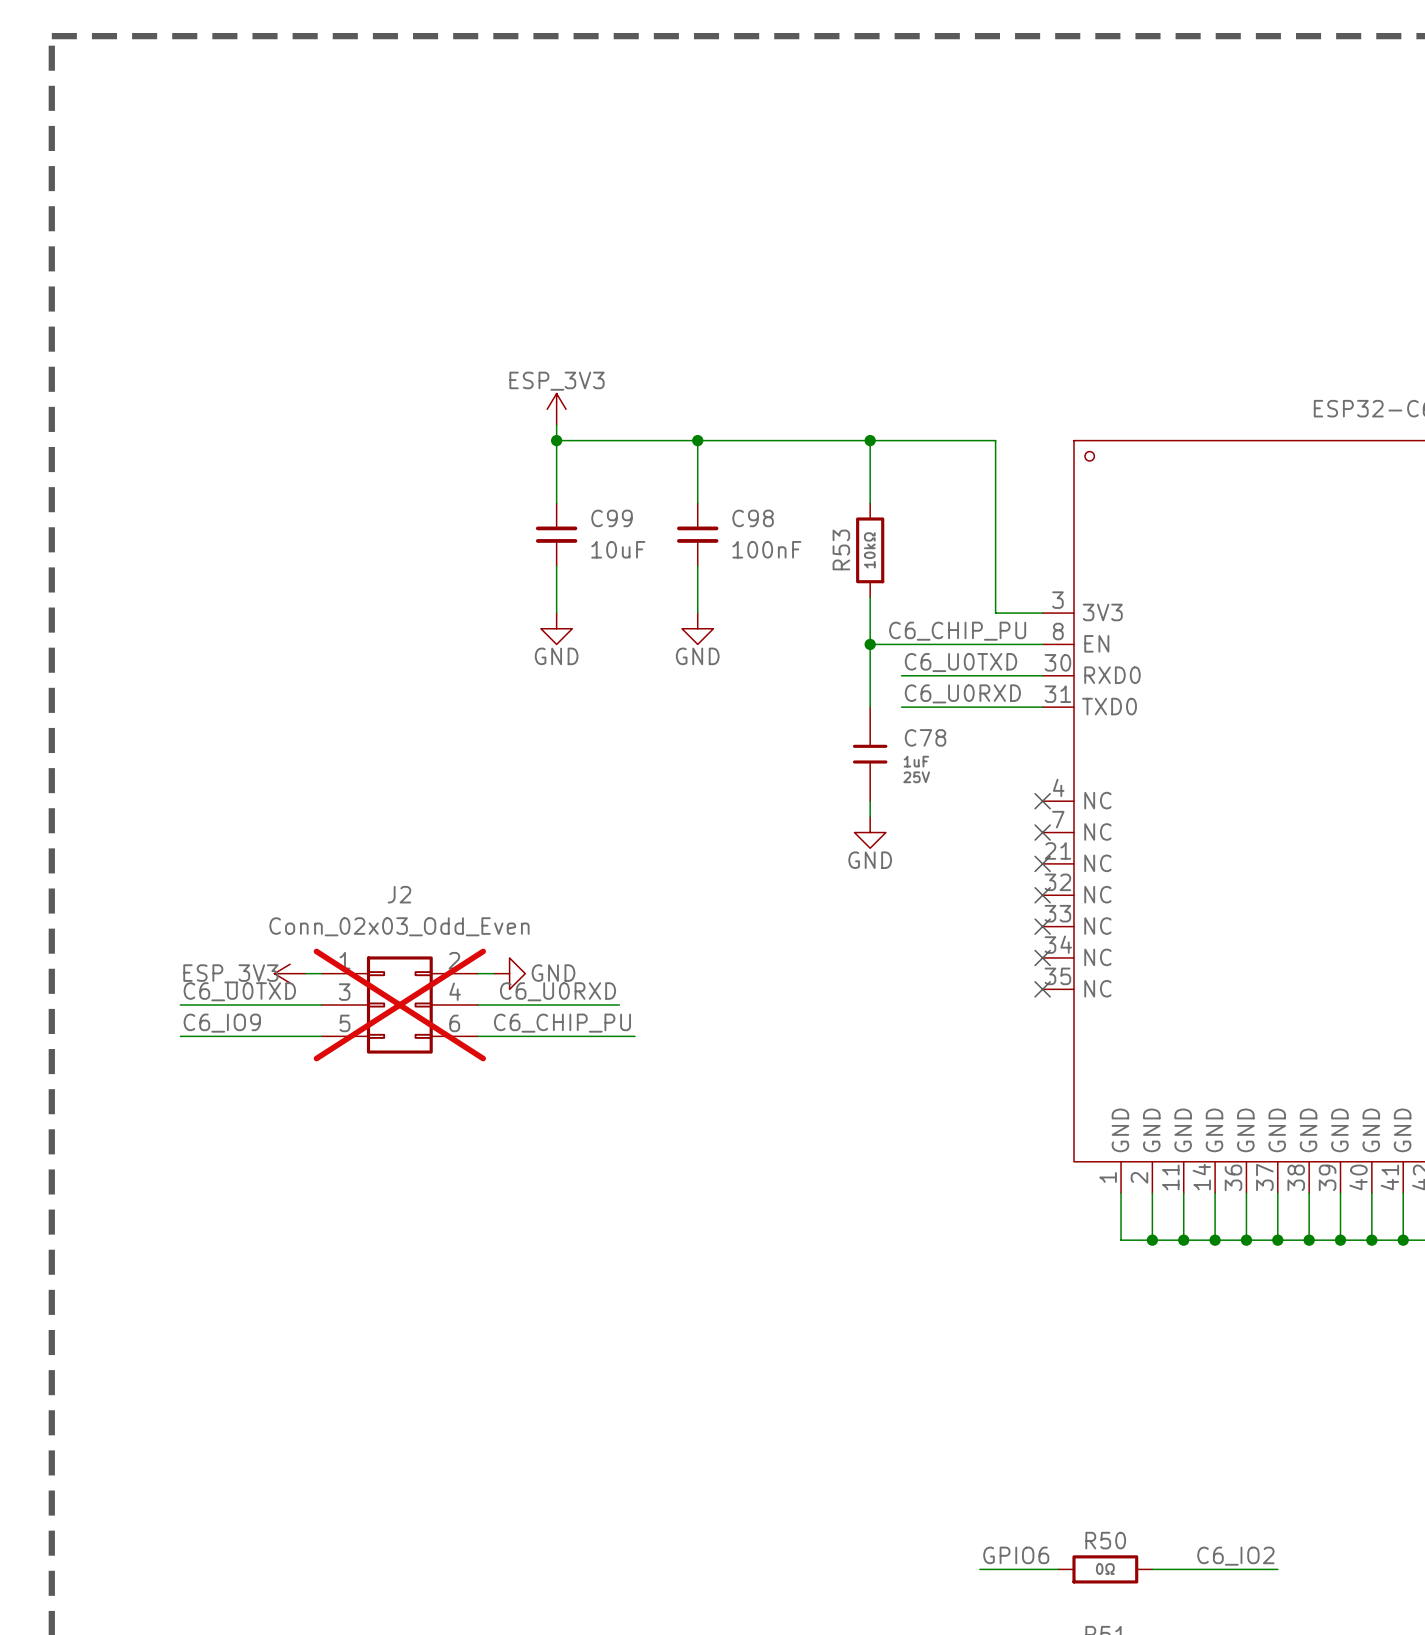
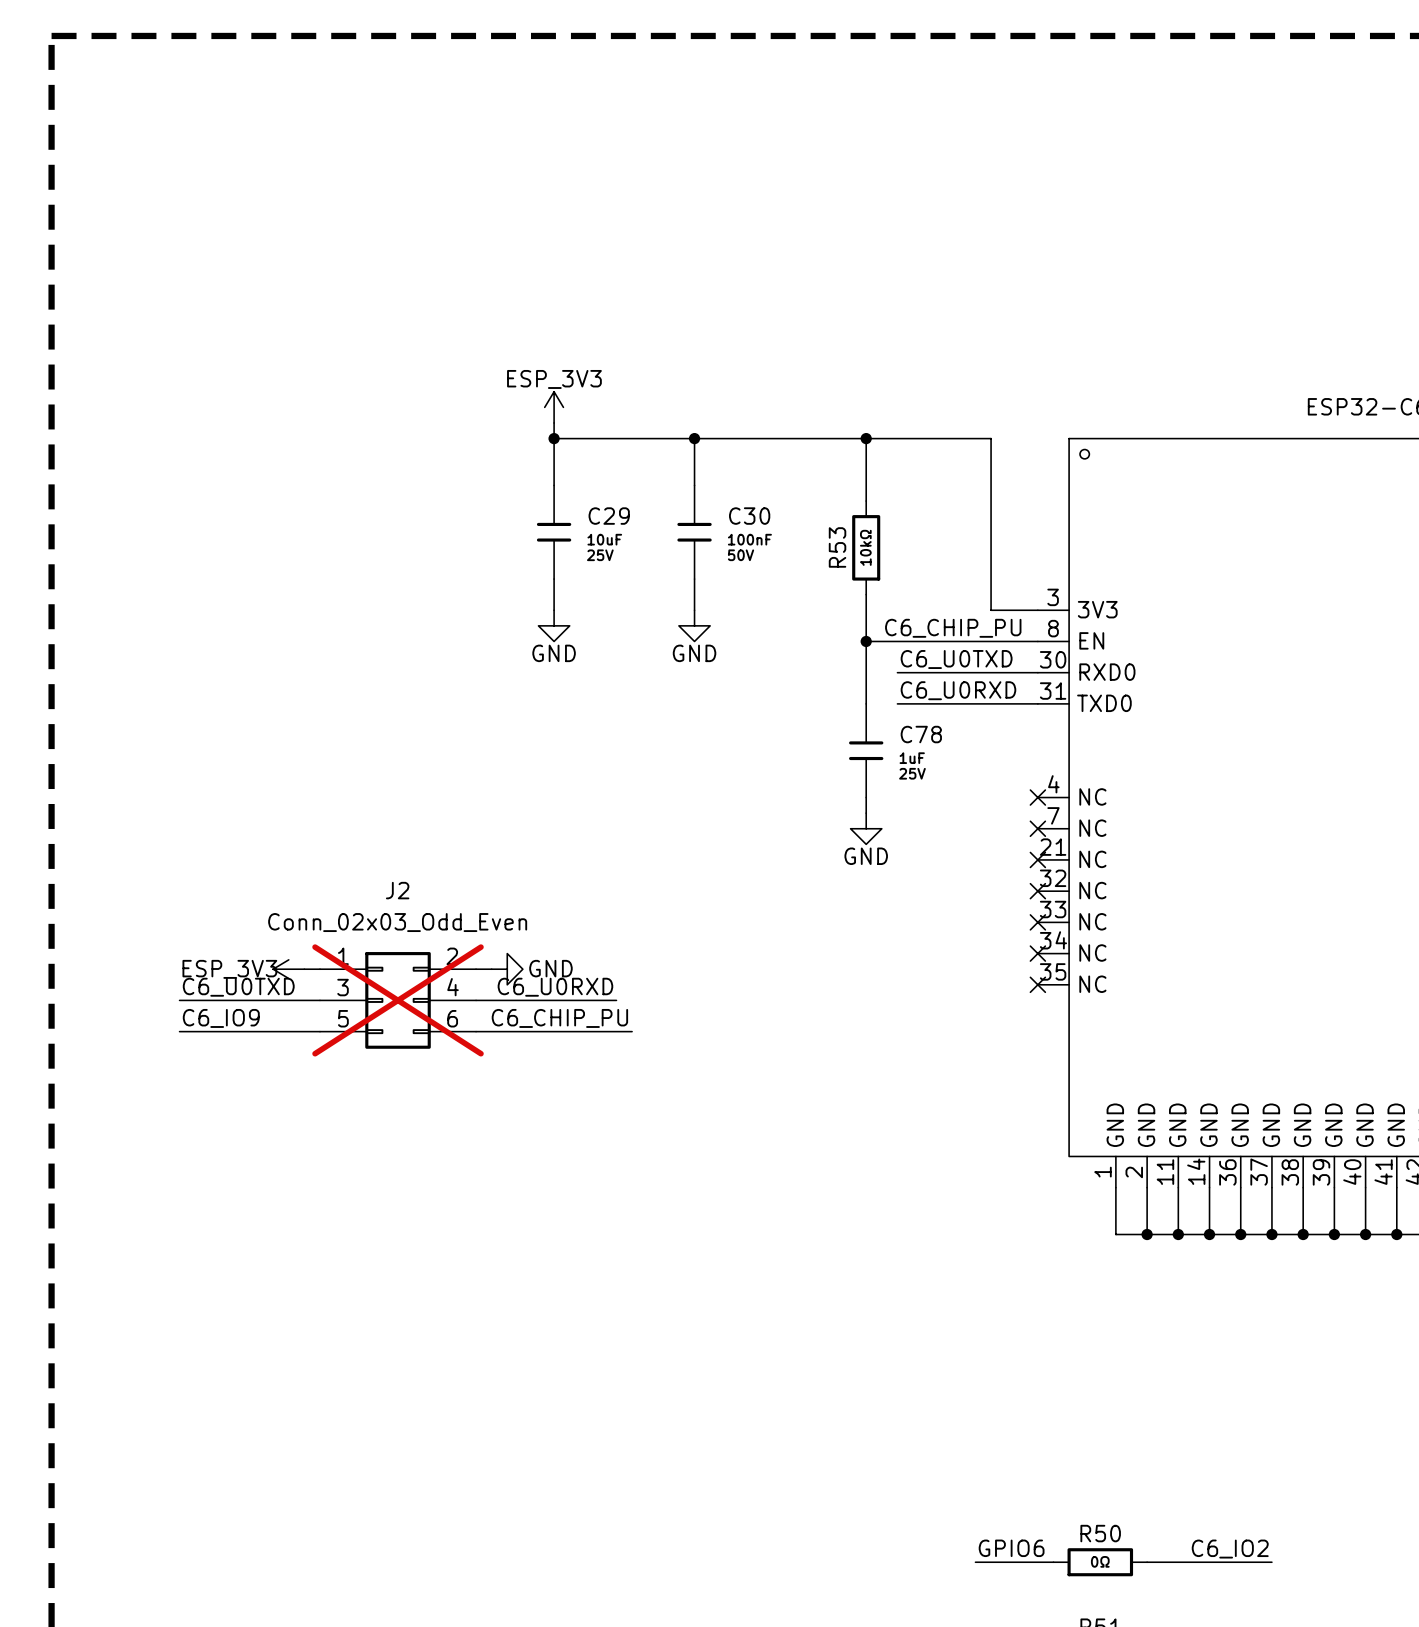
C99: 10uF (556, 534) -> none
C29: none -> 10uF (554, 532)
C98: 100nF (697, 534) -> none
C30: none -> 100nF (694, 532)

